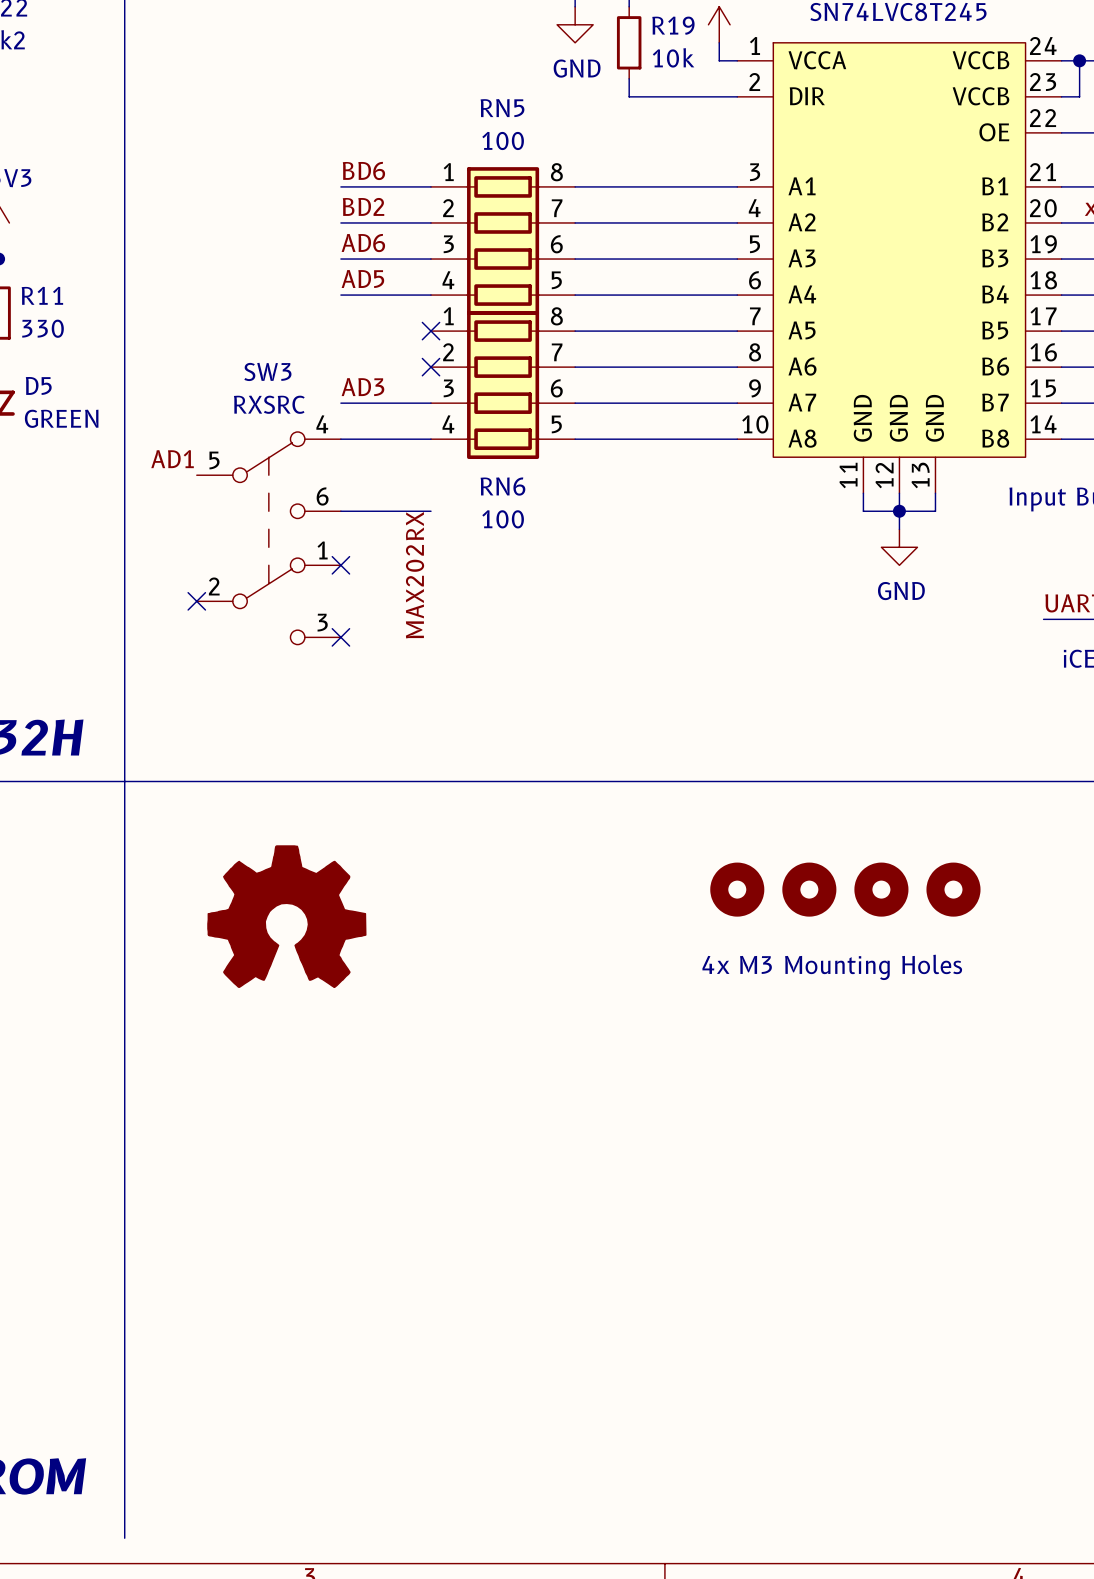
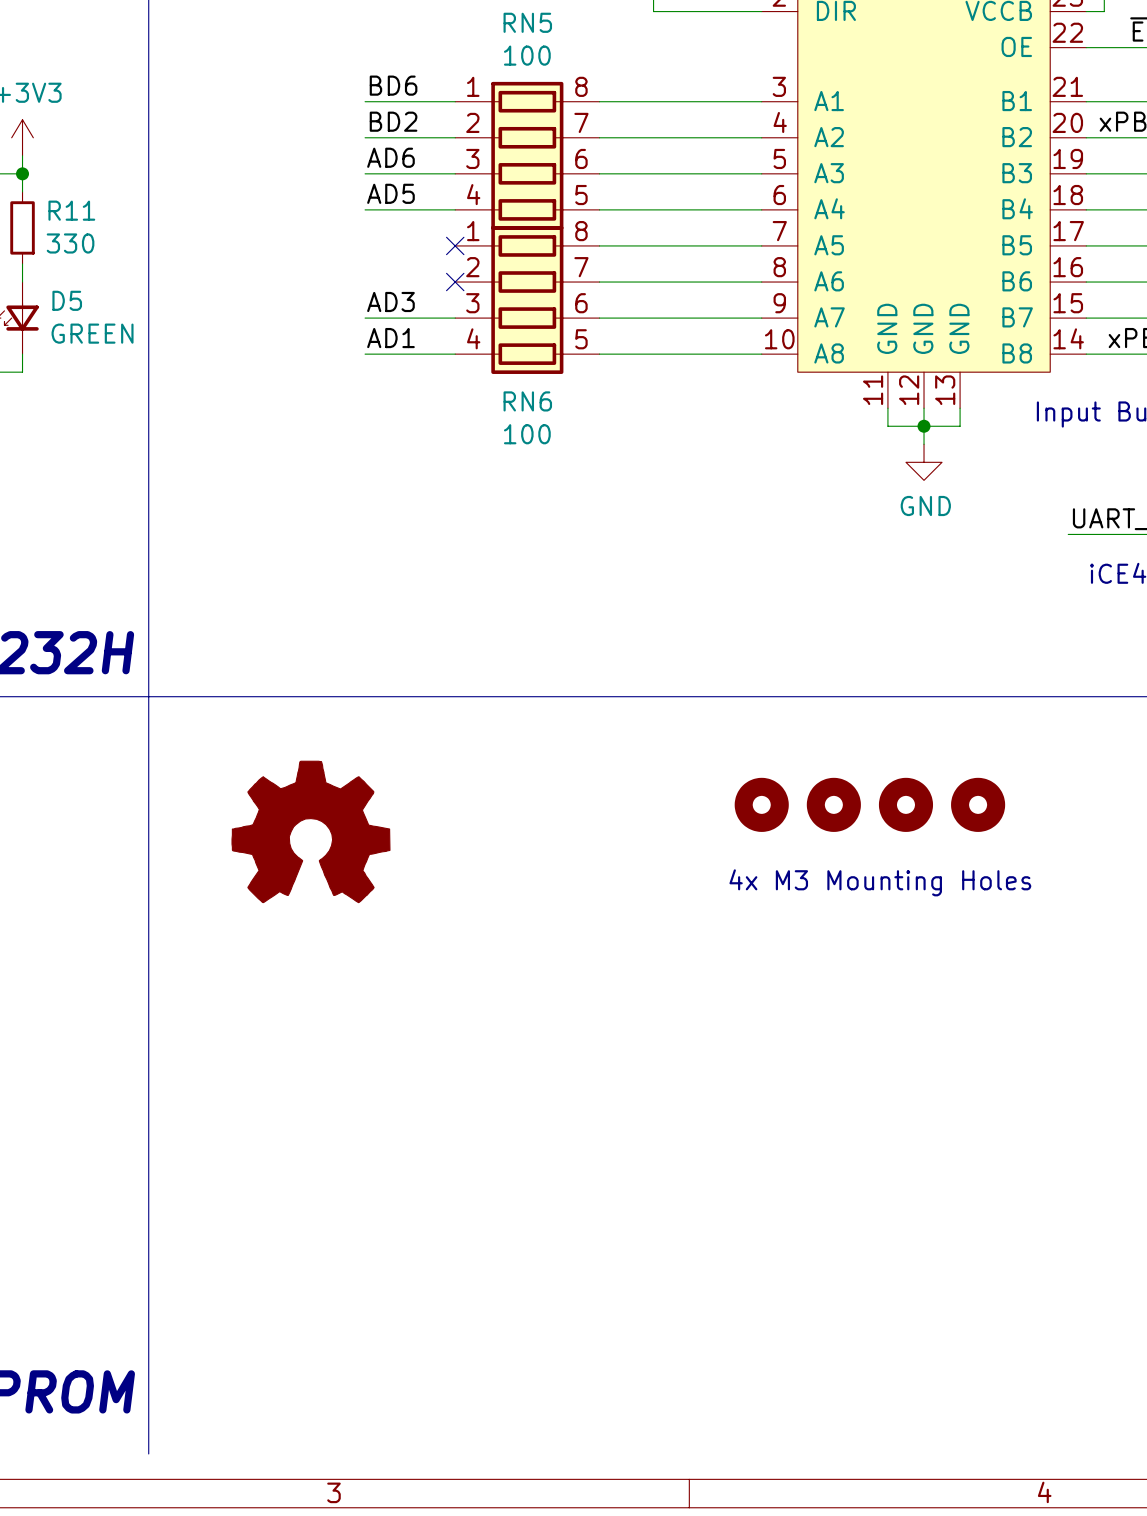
label position: AD1 (172, 459) -> AD1 (390, 338)
wire: (340, 511) (431, 511) -> none
SW3: RXSRC (268, 538) -> none
no-connect mark: (340, 565) -> none
label: MAX202RX (415, 575) -> none
no-connect mark: (196, 601) -> none
no-connect mark: (340, 637) -> none

